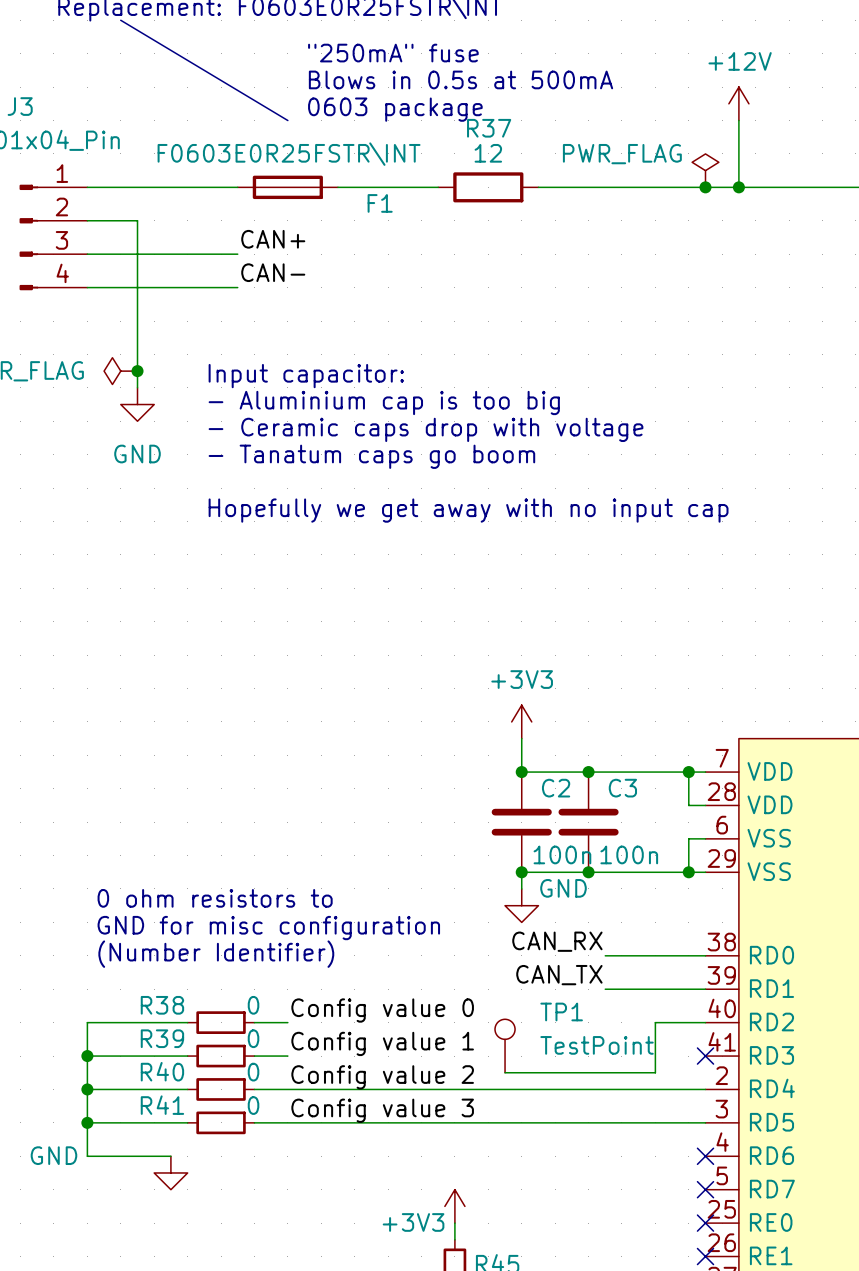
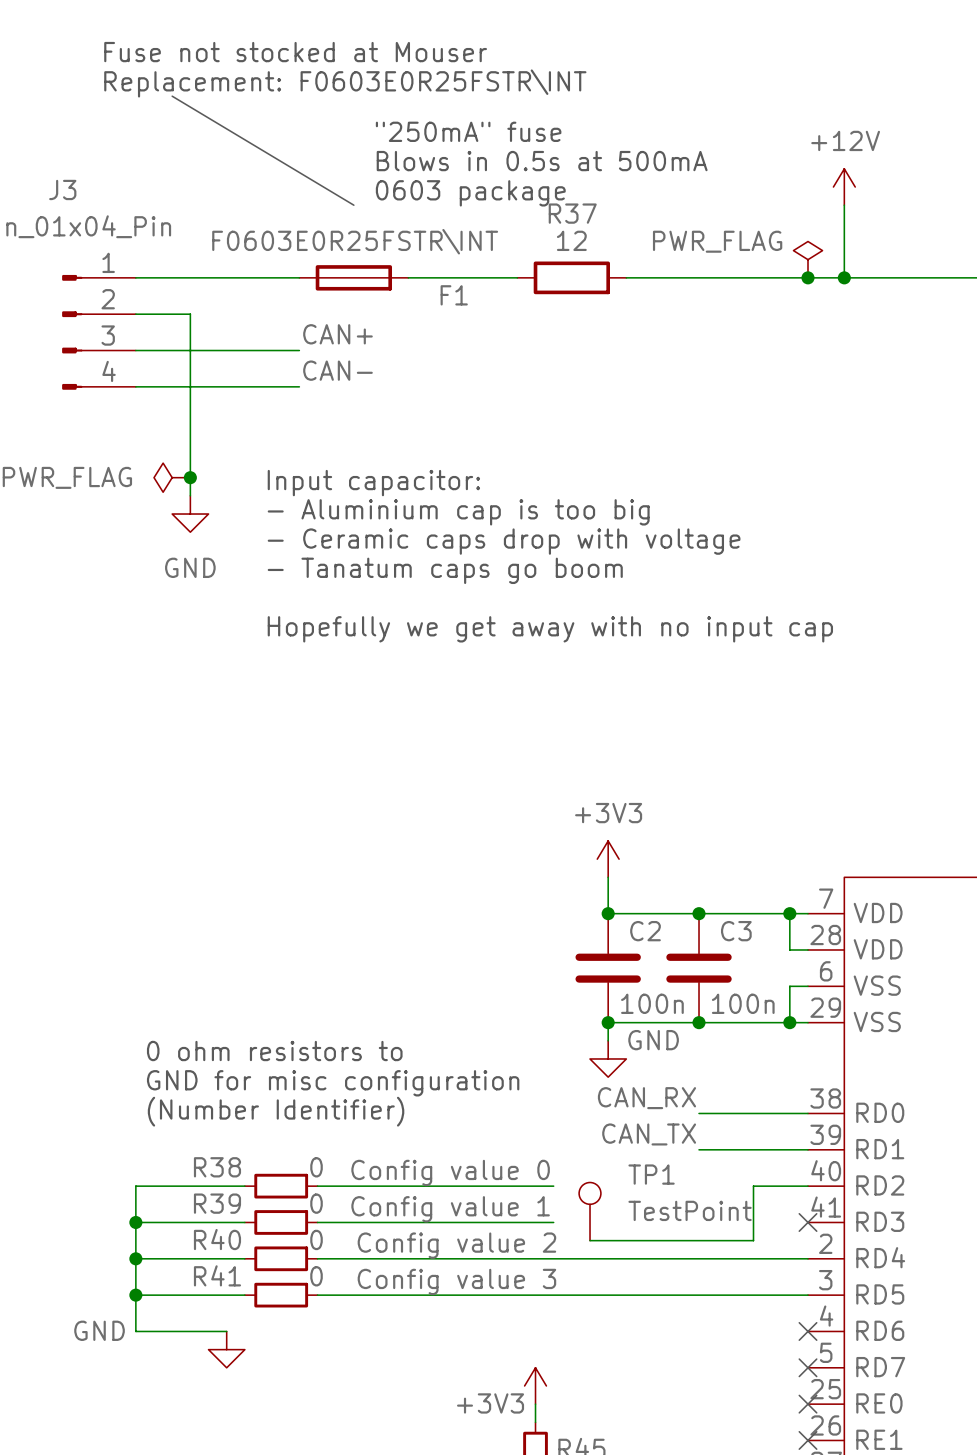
junction position: (588, 772) -> (699, 913)
C3 position: (588, 822) -> (699, 968)
junction position: (588, 872) -> (699, 1022)
label position: Config value 0 (382, 1010) -> Config value 0 (450, 1172)
wire: none -> (353, 1186) (553, 1186)
label position: Config value 1 (382, 1043) -> Config value 1 (450, 1209)
wire: none -> (353, 1222) (553, 1222)

